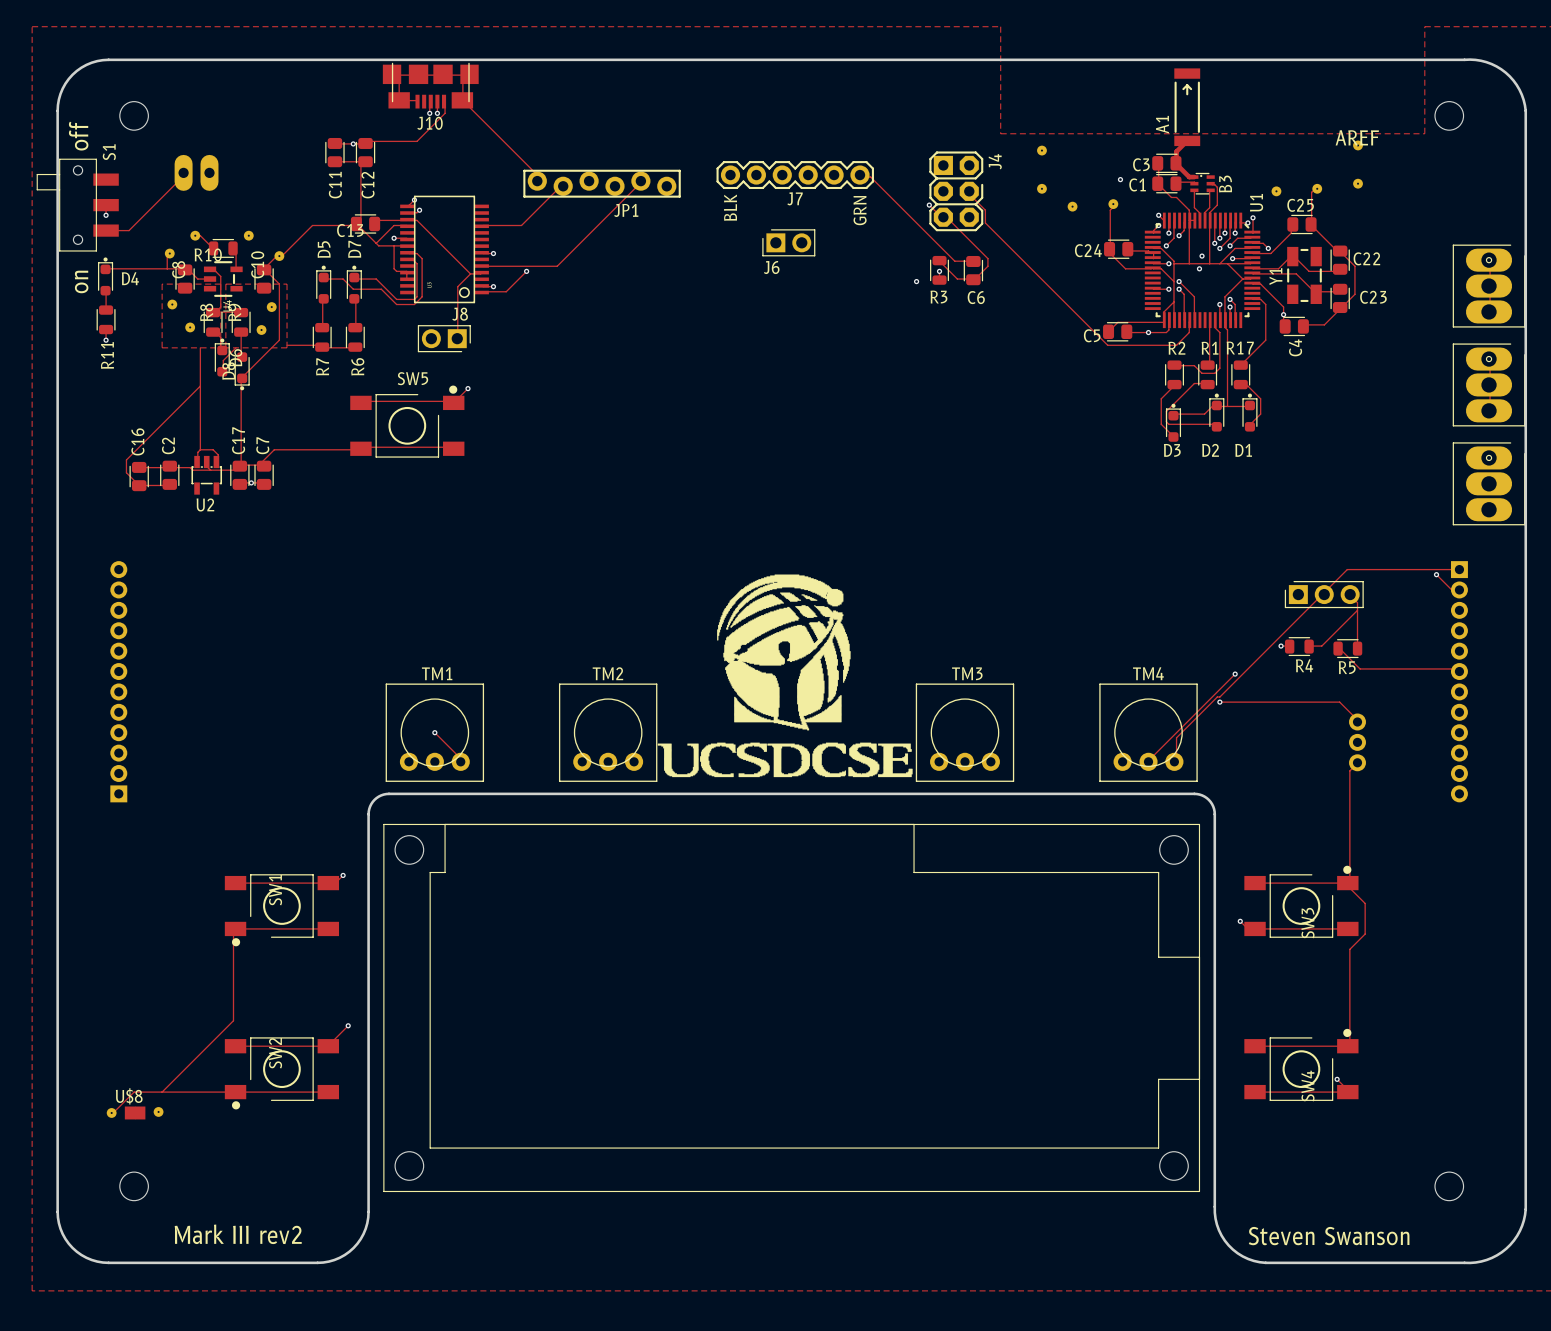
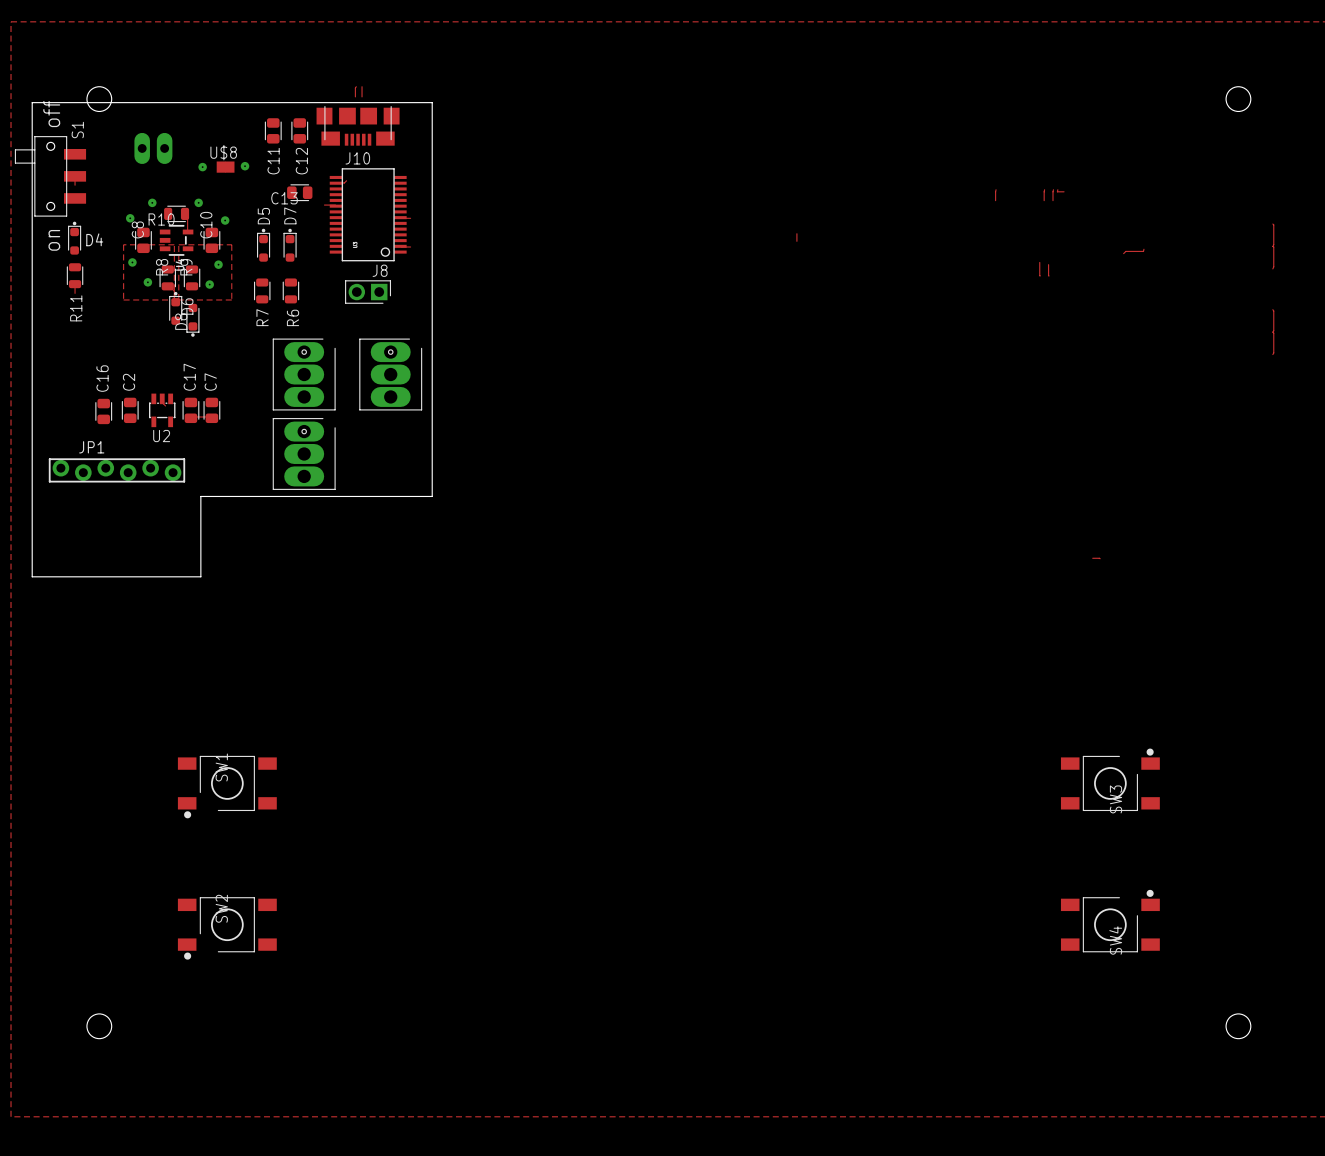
zone outline: (1000, 26) (1000, 133) (1424, 133) (1424, 26) -> (849, 21) (1217, 21)
board edge: (108, 59) (1470, 59) (1491, 64) (1505, 72) (1519, 89) (1525, 110) (1525, 1209) (1522, 1225) (1513, 1240) (1497, 1255) (1486, 1259) (1470, 1262) (1265, 1262) (1242, 1256) (1224, 1240) (1216, 1224) (1214, 1212) (1214, 814) (1212, 804) (1202, 795) (1194, 793) (388, 793) (381, 795) (374, 799) (370, 806) (368, 814) (368, 1211) (365, 1228) (360, 1238) (344, 1255) (334, 1259) (317, 1262) (108, 1262) (91, 1259) (76, 1251) (62, 1233) (57, 1211) (57, 110) (60, 93) (72, 74) (91, 62) (108, 59) -> none
J10 position: (430, 85) -> (358, 125)
track: (417, 101) (399, 100) (399, 75) (392, 74) (469, 74) (462, 75) (462, 100) (536, 174) (537, 181) -> none
track: (444, 101) (445, 113) (417, 141) (334, 143) -> none
A1: (1187, 107) -> none
via: (429, 113) -> none
via: (437, 113) -> none
board edge: none -> (32, 102) (32, 576) (200, 576) (200, 496) (432, 496) (432, 102) (32, 102)
text: AREF (1357, 137) -> none
track: (1187, 140) (1176, 151) (1175, 163) (1189, 177) (1194, 177) -> none
via: (353, 143) -> none
part: (1358, 145) -> none
part: (1041, 150) -> none
track: (334, 161) (365, 161) (360, 161) (360, 228) (356, 223) -> none
track: (1157, 163) (1157, 183) (1171, 197) (1176, 197) (1189, 210) (1189, 220) -> none
C3: (1166, 163) -> none
track: (183, 172) (185, 174) (129, 230) (106, 230) -> none
J7: (795, 175) -> none
track: (859, 175) (860, 177) (870, 177) (954, 261) (973, 261) -> none
via: (1120, 179) -> none
track: (640, 181) (557, 266) (481, 266) -> none
JP1 position: (602, 183) -> (116, 470)
C1: (1166, 183) -> none
track: (1175, 183) (1176, 182) (1194, 182) (1194, 183) -> none
B3: (1202, 183) -> none
track: (1210, 183) (1217, 187) (1217, 205) (1209, 212) (1209, 263) -> none
part: (1358, 183) -> none
track: (563, 186) (562, 184) (521, 225) (481, 226) -> none
part: (1041, 188) -> none
track: (1317, 188) (1316, 187) (1311, 192) (1311, 224) (1354, 266) (1354, 294) (1324, 324) (1303, 326) -> none
part: (1317, 188) -> none
track: (1194, 189) (1194, 207) (1199, 212) (1199, 220) -> none
track: (1210, 190) (1209, 207) (1204, 212) (1205, 220) -> none
J4: (956, 191) -> none
track: (969, 191) (967, 192) (985, 210) (985, 222) (1107, 345) (1176, 345) (1189, 332) (1189, 320) -> none
part: (1276, 191) -> none
part: none -> (245, 166)
part: none -> (202, 167)
track: (414, 200) (407, 206) -> none
via: (414, 200) -> none
track: (1113, 204) (1115, 205) (1110, 210) (1110, 248) (1107, 250) (1125, 268) (1161, 268) (1173, 281) -> none
part: (1113, 204) -> none
track: (929, 205) (942, 217) (944, 215) (987, 258) (987, 266) (975, 279) (957, 279) (939, 260) -> none
via: (929, 205) -> none
part: (1072, 206) -> none
via: (419, 210) -> none
JP1 name position: JP1 (626, 210) -> JP1 (91, 447)
via: (106, 215) -> none
track: (1158, 215) (1164, 220) -> none
via: (1158, 215) -> none
track: (1253, 217) (1252, 232) -> none
via: (1253, 217) -> none
track: (1174, 220) (1173, 238) (1166, 245) -> none
track: (1184, 220) (1184, 230) (1179, 235) -> none
track: (1189, 220) (1194, 220) -> none
track: (1189, 220) (1189, 263) -> none
track: (1215, 220) (1214, 243) -> none
track: (1220, 220) (1219, 238) -> none
track: (1230, 220) (1230, 238) (1219, 248) -> none
via: (1247, 222) -> none
track: (356, 223) (378, 245) (407, 246) -> none
track: (356, 223) (355, 225) (312, 225) (281, 256) (276, 256) (264, 268) -> none
track: (374, 223) (378, 220) (417, 220) (470, 273) -> none
track: (1292, 224) (1291, 233) (1270, 253) (1252, 252) -> none
C25: (1301, 224) -> none
track: (1158, 225) (1152, 232) -> none
via: (1158, 225) -> none
track: (407, 226) (394, 225) (376, 243) -> none
via: (1168, 233) -> none
via: (1224, 233) -> none
via: (1235, 233) -> none
track: (195, 235) (200, 235) (213, 248) -> none
via: (1179, 235) -> none
track: (1252, 237) (1237, 238) (1230, 245) -> none
via: (394, 238) -> none
via: (1219, 238) -> none
J6: (788, 242) -> none
track: (1252, 242) (1263, 243) (1268, 248) -> none
via: (1214, 243) -> none
track: (394, 245) (394, 268) (396, 271) (406, 271) (407, 279) -> none
via: (1166, 245) -> none
via: (1230, 245) -> none
track: (1152, 247) (1161, 248) (1173, 261) (1174, 320) -> none
track: (1252, 247) (1235, 248) (1219, 263) -> none
via: (1219, 248) -> none
via: (1268, 248) -> none
C24: (1118, 249) -> none
track: (1127, 249) (1128, 250) (1148, 250) (1153, 253) (1152, 257) -> none
track: (407, 252) (417, 253) (422, 258) (422, 296) (414, 304) (396, 304) (381, 289) (353, 289) (343, 279) (323, 277) -> none
track: (169, 253) (167, 256) (167, 268) -> none
via: (493, 253) -> none
via: (1202, 256) -> none
track: (1252, 257) (1232, 258) -> none
via: (1232, 258) -> none
track: (407, 259) (411, 258) (417, 263) (417, 296) (414, 299) (396, 299) (376, 279) (354, 277) -> none
C22: (1340, 260) -> none
track: (1152, 262) (1168, 263) -> none
track: (1252, 262) (1173, 263) -> none
via: (1168, 263) -> none
track: (1227, 263) (1242, 279) -> none
track: (1252, 267) (1278, 268) (1291, 256) (1293, 256) (1309, 271) (1339, 271) (1340, 269) -> none
track: (264, 268) (279, 284) (279, 340) (241, 378) (241, 465) -> none
via: (1199, 268) -> none
track: (105, 269) (185, 268) (185, 271) (190, 271) (197, 279) (210, 279) -> none
track: (210, 269) (220, 276) (220, 307) (213, 314) (213, 312) (215, 312) (241, 312) (241, 312) -> none
R3: (939, 270) -> none
C6: (973, 270) -> none
U1: (1202, 270) -> none
track: (526, 271) (506, 291) (481, 292) -> none
via: (526, 271) -> none
via: (939, 271) -> none
track: (481, 272) (470, 273) -> none
track: (1252, 272) (1296, 273) (1316, 294) -> none
track: (470, 273) (457, 286) (457, 338) -> none
Y1: (1304, 275) -> none
track: (1252, 278) (1242, 279) -> none
track: (1242, 279) (1224, 296) (1224, 327) (1227, 330) (1227, 406) -> none
via: (916, 281) -> none
track: (1179, 281) (1194, 296) (1194, 320) -> none
via: (1179, 281) -> none
track: (1252, 283) (1260, 284) (1283, 307) (1285, 326) -> none
via: (493, 286) -> none
part: (1489, 286) -> none
track: (1152, 288) (1168, 289) -> none
via: (1168, 289) -> none
track: (1179, 289) (1184, 294) (1184, 320) -> none
via: (1179, 289) -> none
track: (105, 290) (106, 310) -> none
track: (323, 298) (322, 327) -> none
track: (354, 298) (355, 299) (355, 327) -> none
track: (1252, 298) (1260, 299) (1265, 304) (1265, 340) (1240, 365) -> none
C23: (1340, 298) -> none
track: (1230, 299) (1235, 304) (1235, 320) -> none
via: (1230, 299) -> none
track: (1173, 301) (1163, 312) (1163, 322) (1117, 322) (1108, 331) -> none
via: (1219, 304) -> none
via: (1230, 307) -> none
via: (1283, 314) -> none
track: (1169, 320) (1168, 330) (1166, 332) (1126, 331) -> none
track: (1210, 320) (1209, 363) (1207, 365) -> none
track: (1215, 320) (1214, 327) (1219, 332) (1219, 368) (1214, 373) (1202, 373) (1194, 365) (1174, 365) -> none
C4: (1294, 326) -> none
C5: (1117, 331) -> none
track: (241, 332) (242, 357) -> none
via: (1148, 332) -> none
via: (106, 340) -> none
track: (287, 345) (320, 345) (322, 347) (355, 347) -> none
track: (200, 347) (200, 449) -> none
track: (236, 347) (223, 360) (222, 371) -> none
R2: (1174, 374) -> none
R1: (1207, 374) -> none
R17: (1240, 374) -> none
track: (1174, 384) (1161, 398) (1161, 424) (1173, 436) -> none
track: (1207, 384) (1194, 383) (1166, 411) (1166, 421) (1168, 424) (1214, 424) (1216, 426) -> none
track: (1240, 384) (1247, 386) (1260, 398) (1260, 414) (1249, 426) -> none
part: (1489, 384) -> none
track: (200, 386) (126, 459) (126, 472) (139, 485) (169, 484) -> none
track: (467, 388) (453, 402) (452, 401) (360, 401) (360, 402) -> none
via: (467, 388) -> none
track: (1249, 405) (1217, 406) (1214, 403) (1204, 414) (1173, 414) (1173, 415) -> none
D2: (1216, 412) -> none
D1: (1249, 412) -> none
SW5: (407, 421) -> none
D3: (1173, 422) -> none
part: none -> (304, 374)
part: none -> (390, 374)
track: (453, 448) (452, 447) (360, 447) (360, 449) (274, 449) (258, 465) (264, 466) (241, 465) -> none
track: (200, 449) (213, 449) (218, 454) (216, 462) -> none
track: (200, 449) (197, 452) (197, 462) -> none
track: (241, 465) (236, 470) (139, 467) -> none
via: (251, 482) -> none
part: (1489, 483) -> none
part: none -> (304, 453)
track: (1459, 569) (1347, 569) (1324, 594) (1176, 737) (1176, 760) (1174, 761) -> none
drawing: [657, 574, 913, 778] -> none
track: (1436, 574) (1451, 589) (1459, 589) -> none
via: (1436, 574) -> none
part: (1324, 594) -> none
track: (1350, 594) (1357, 602) (1357, 648) -> none
track: (1357, 610) (1321, 646) (1309, 646) -> none
via: (1281, 646) -> none
R4: (1299, 646) -> none
track: (1338, 648) (1360, 668) (1456, 668) (1459, 671) -> none
R5: (1347, 648) -> none
track: (1235, 674) (1148, 761) -> none
via: (1235, 674) -> none
part: (118, 681) -> none
part: (1459, 681) -> none
track: (1219, 702) (1339, 702) (1357, 722) -> none
via: (1219, 702) -> none
track: (434, 732) (462, 760) (460, 761) -> none
TM1: (434, 732) -> none
via: (434, 732) -> none
TM2: (608, 732) -> none
TM3: (964, 732) -> none
TM4: (1148, 732) -> none
part: (1357, 742) -> none
track: (1357, 762) (1349, 770) (1349, 883) (1255, 883) -> none
track: (343, 875) (335, 883) (235, 883) -> none
via: (343, 875) -> none
track: (1344, 883) (1365, 903) (1365, 934) (1349, 949) (1349, 1046) (1255, 1046) -> none
track: (1240, 921) (1247, 928) (1347, 928) -> none
via: (1240, 921) -> none
track: (328, 928) (233, 928) (233, 1020) (162, 1092) -> none
part: (791, 1007) -> none
track: (348, 1025) (327, 1046) -> none
via: (348, 1025) -> none
track: (235, 1046) (328, 1046) -> none
track: (1337, 1079) (1349, 1092) (1255, 1092) -> none
via: (1337, 1079) -> none
track: (328, 1092) (134, 1092) (111, 1112) -> none
part: (158, 1111) -> none
part: (111, 1112) -> none
U$8 position: (135, 1112) -> (225, 167)
text: Mark III rev2 (238, 1234) -> none
text: Steven Swanson (1329, 1236) -> none

